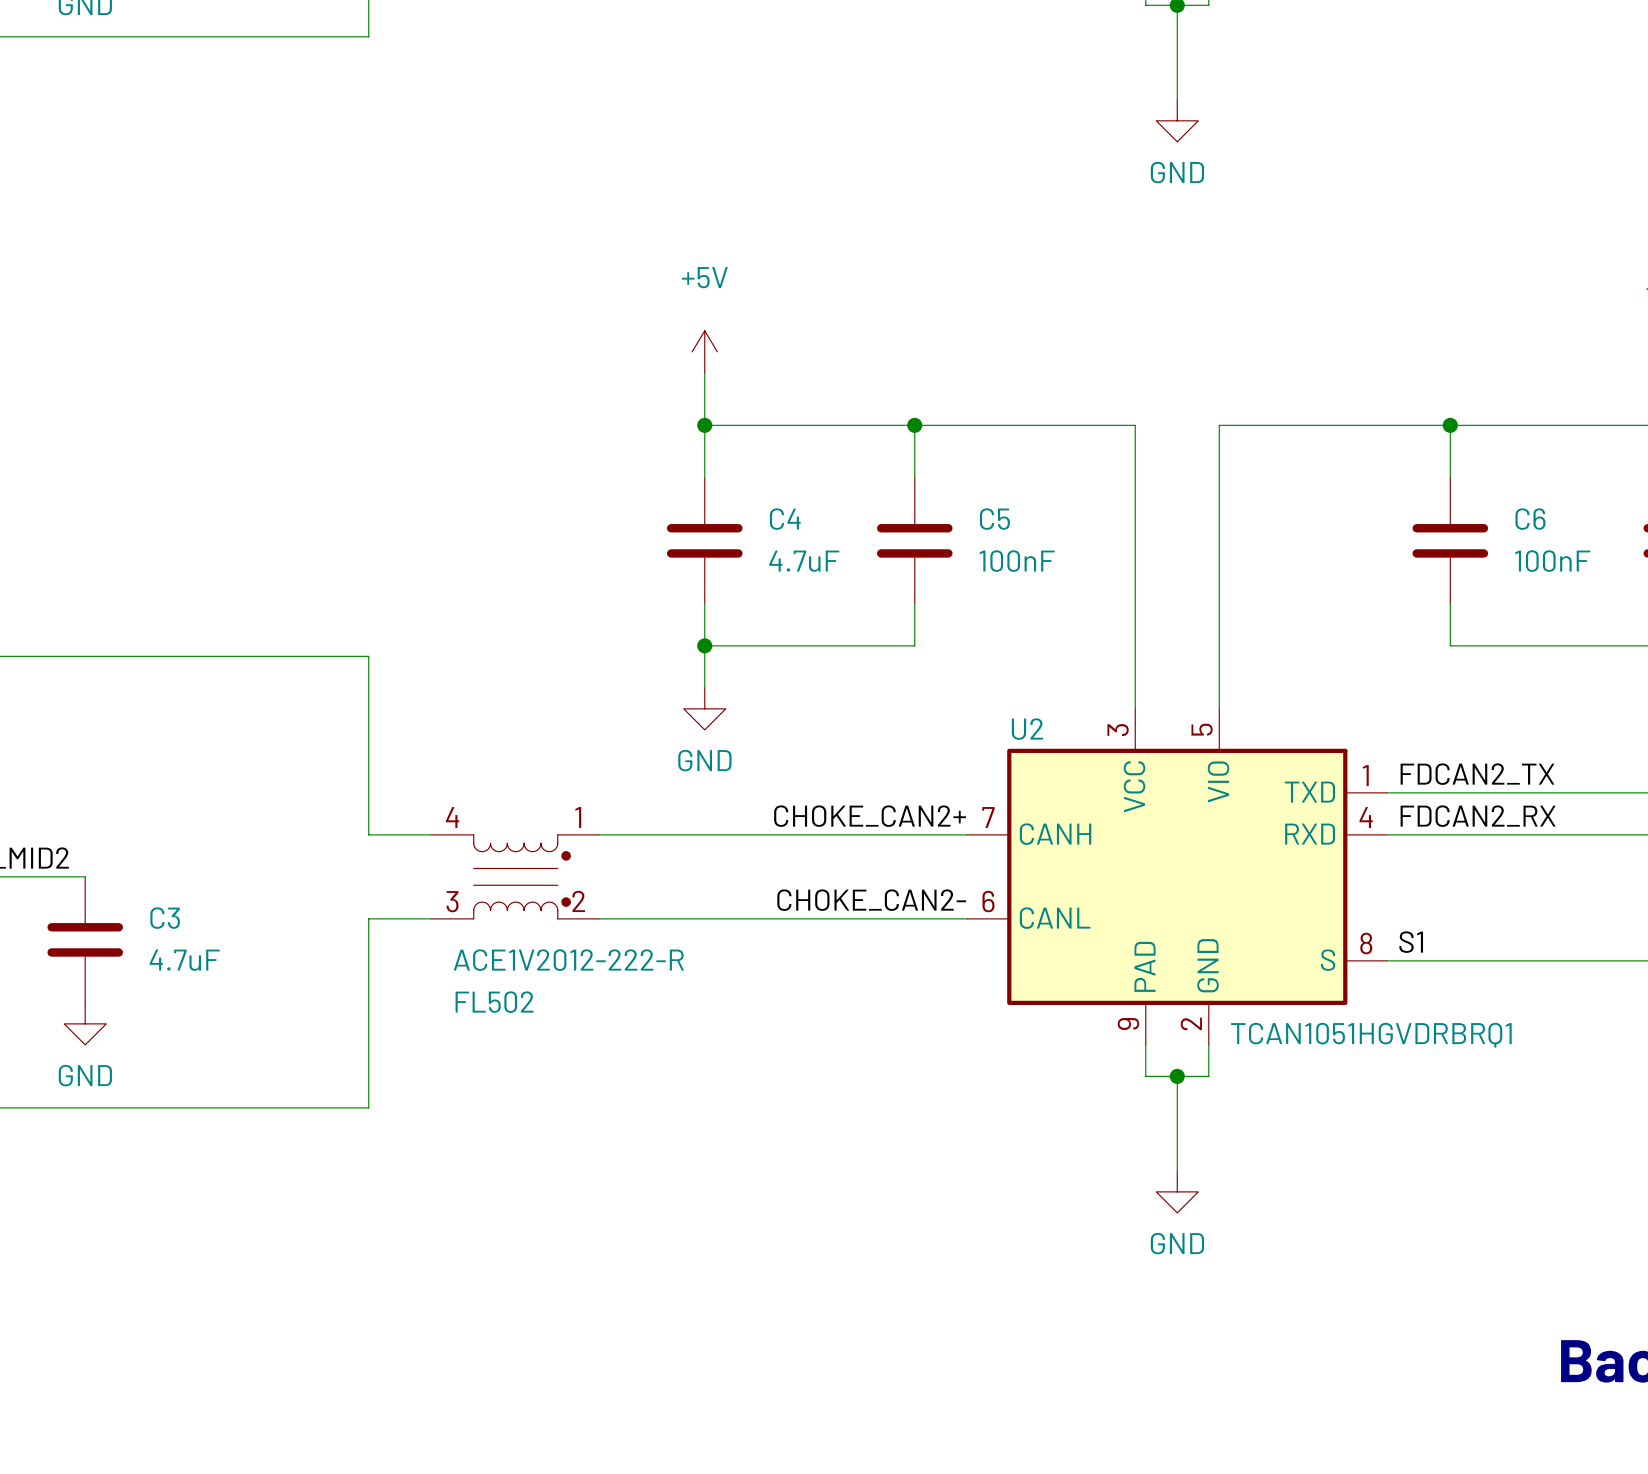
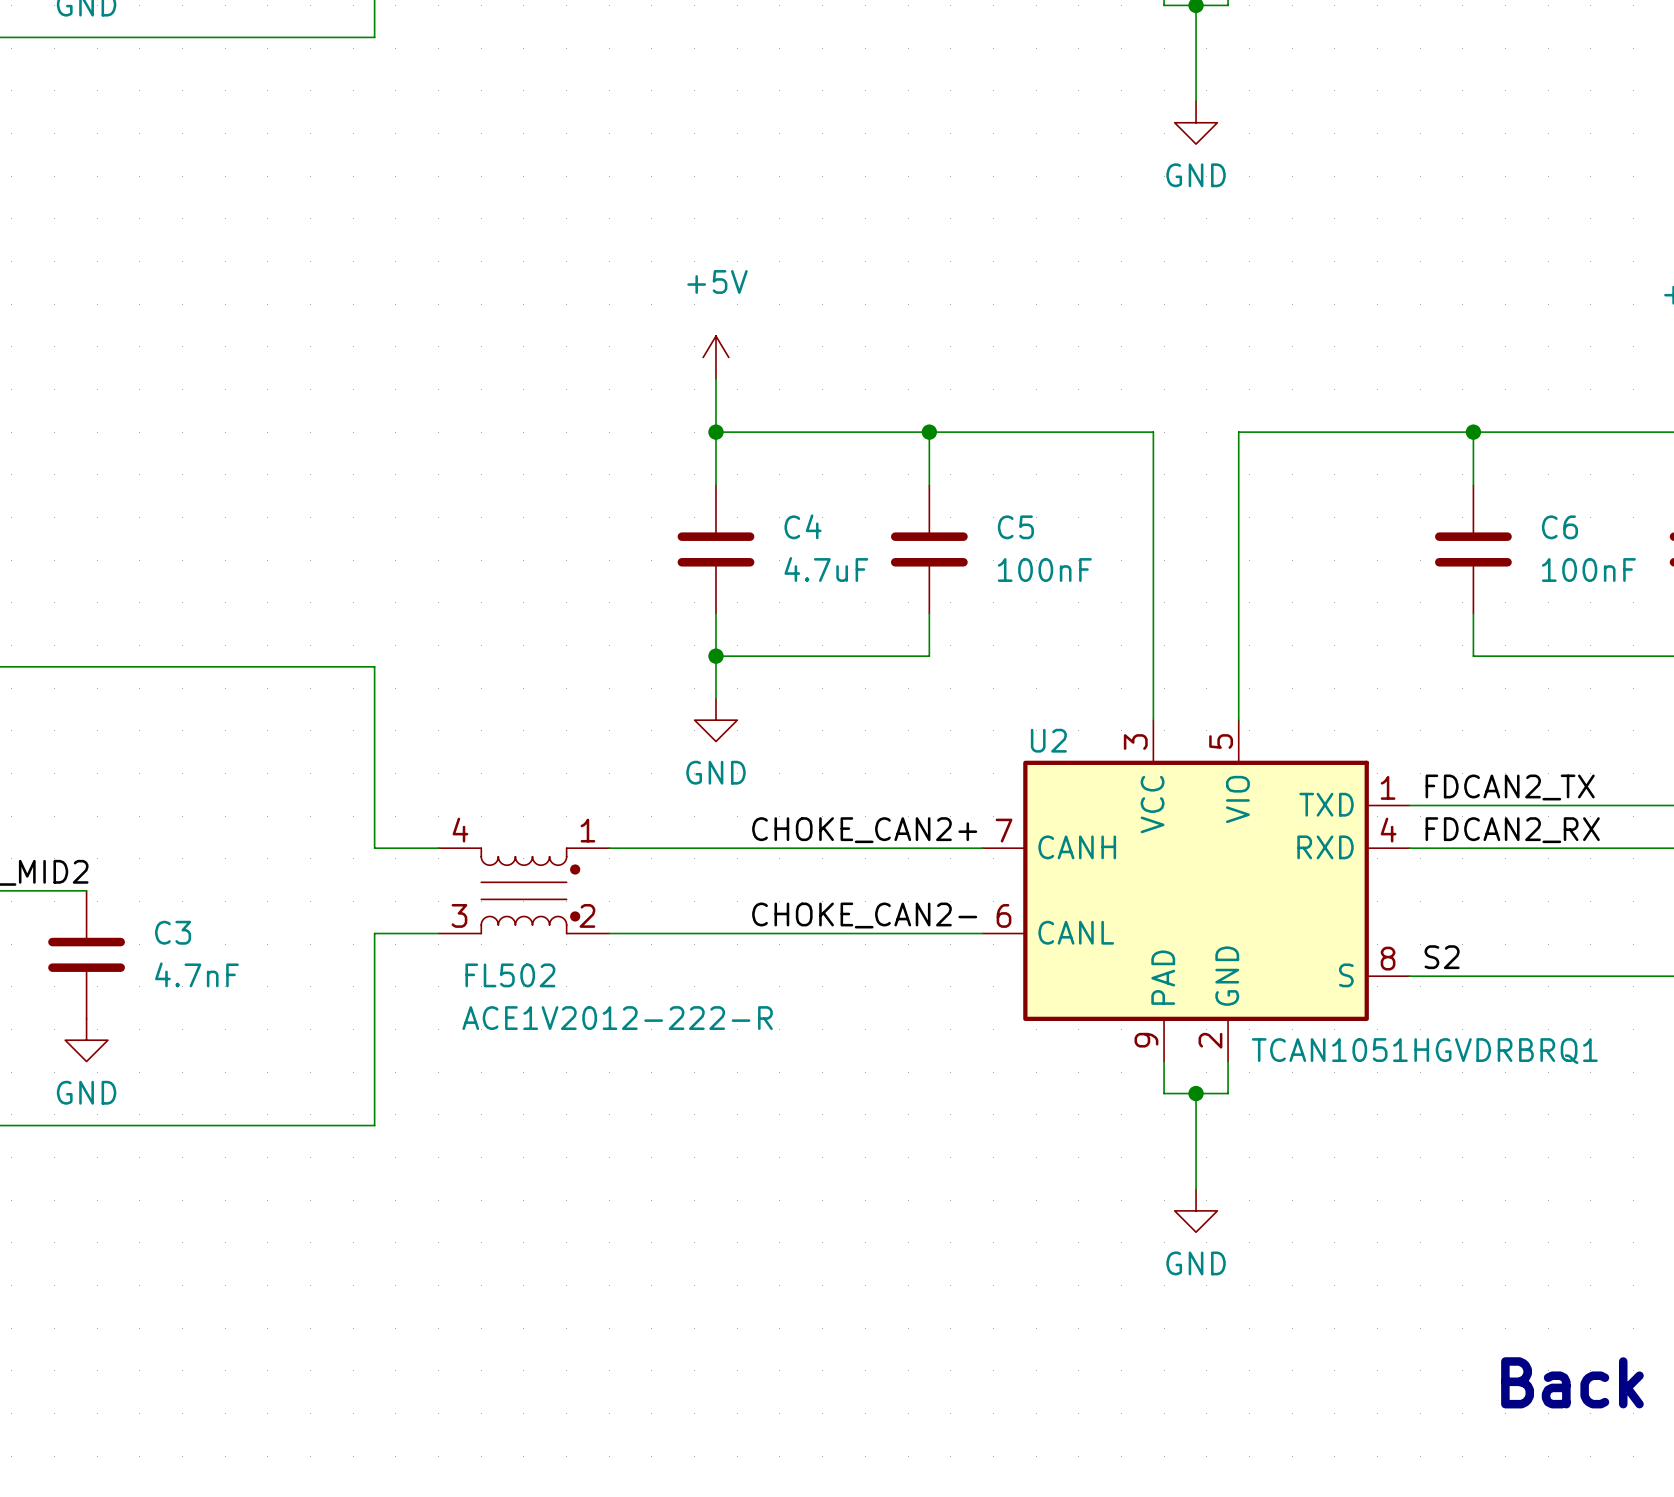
label: S1 (1411, 942) -> S2 (1442, 957)
C3 value: 4.7uF (184, 960) -> 4.7nF (196, 974)
FL502 value position: ACE1V2012-222-R (568, 960) -> ACE1V2012-222-R (617, 1018)
FL502 name position: FL502 (494, 1002) -> FL502 (510, 975)

